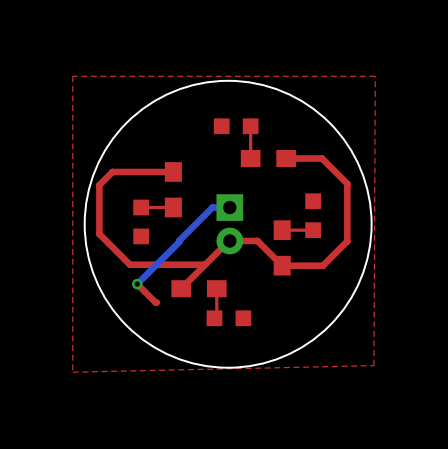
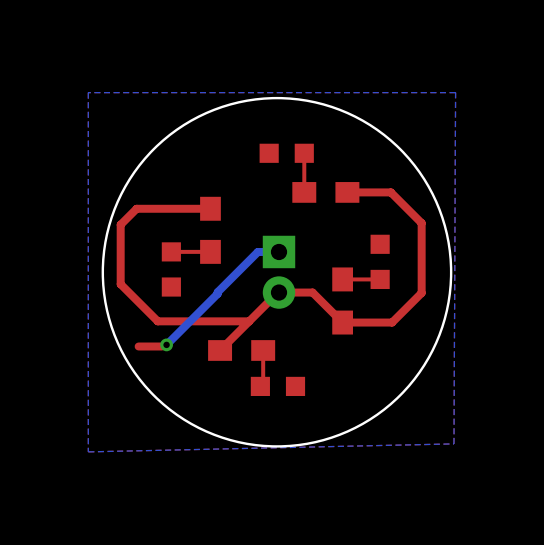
bottom zone outline: none -> (455, 92) (453, 443) (88, 451) (88, 92) (455, 92)
top track: (137, 284) (156, 302) -> none
top track: none -> (161, 346) (138, 346)

